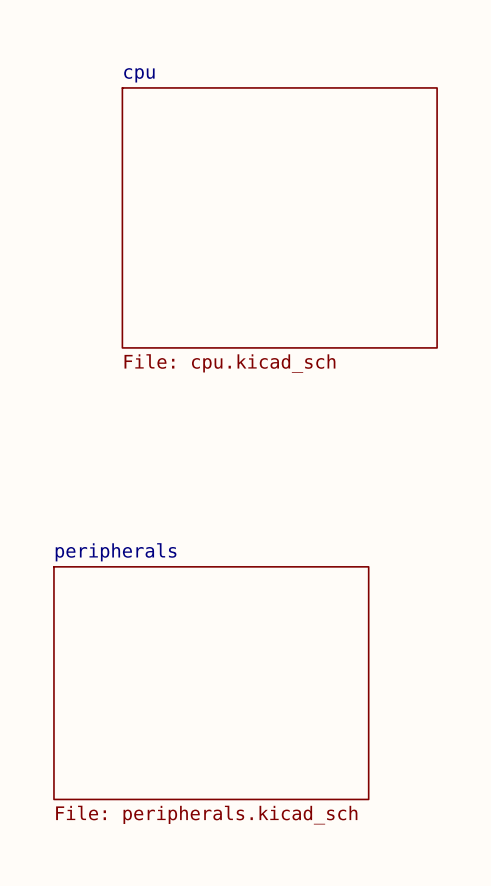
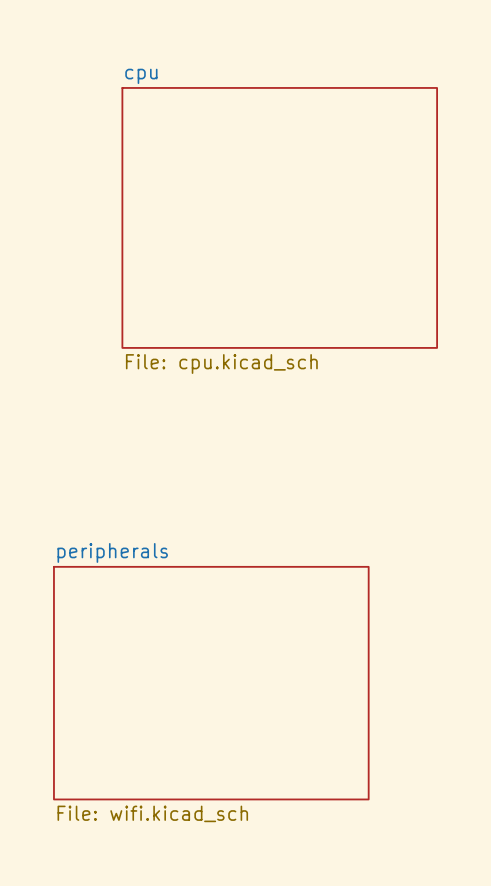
sheet peripherals value: File: peripherals.kicad_sch (206, 815) -> File: wifi.kicad_sch (152, 813)

